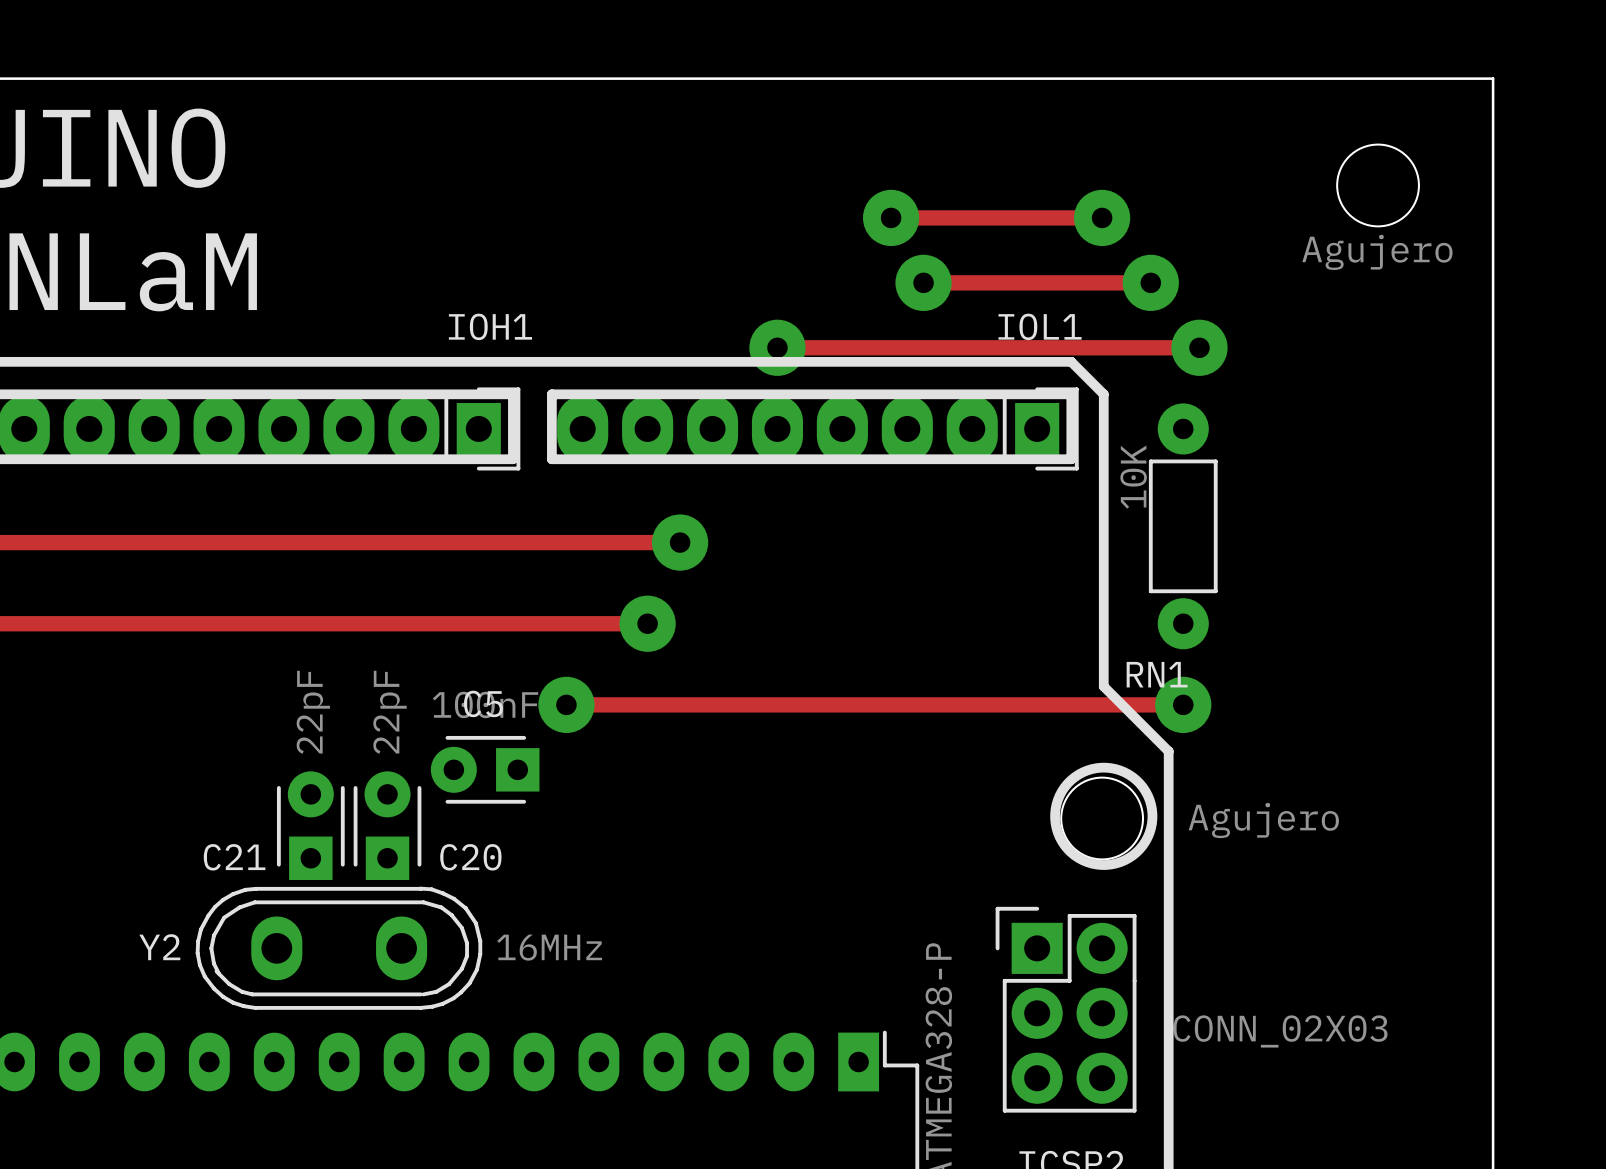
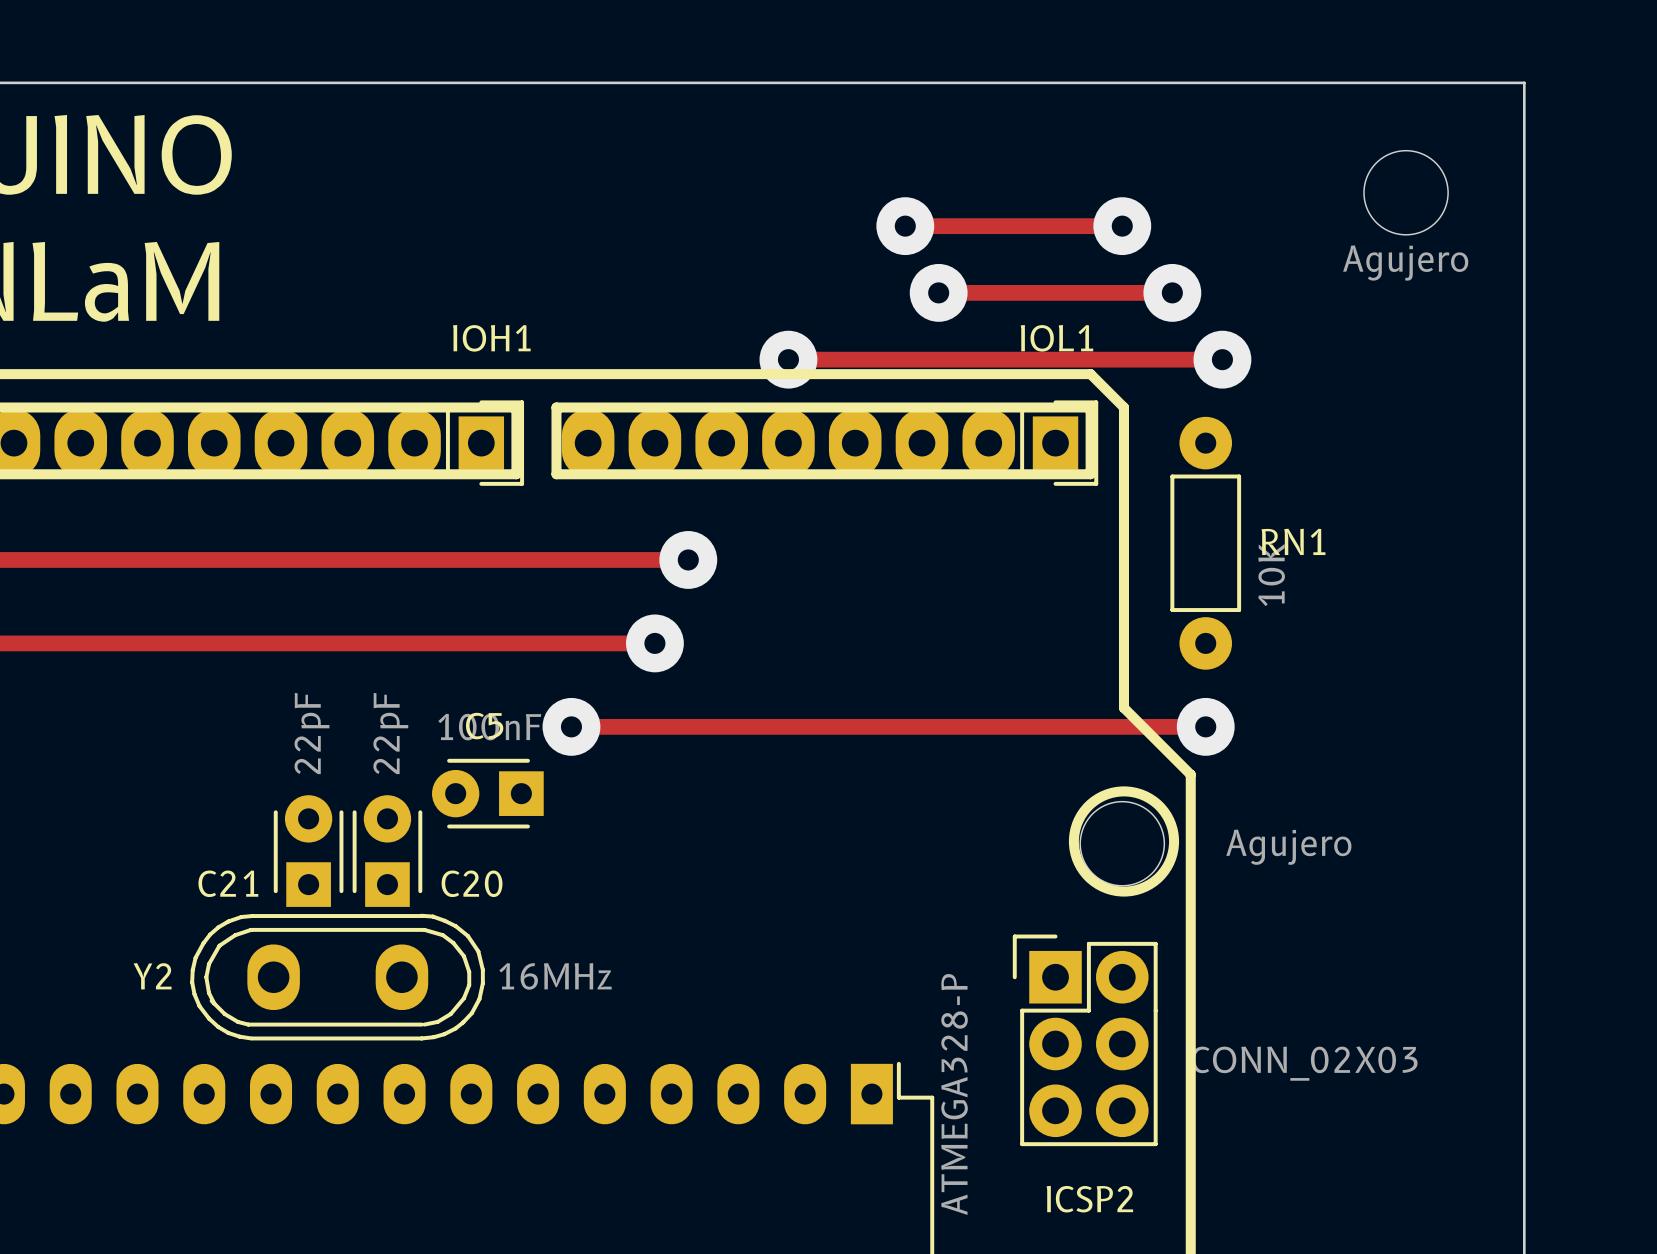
RN1 value position: 10K (1133, 477) -> 10K (1271, 575)
RN1 name position: RN1 (1157, 674) -> RN1 (1293, 541)

